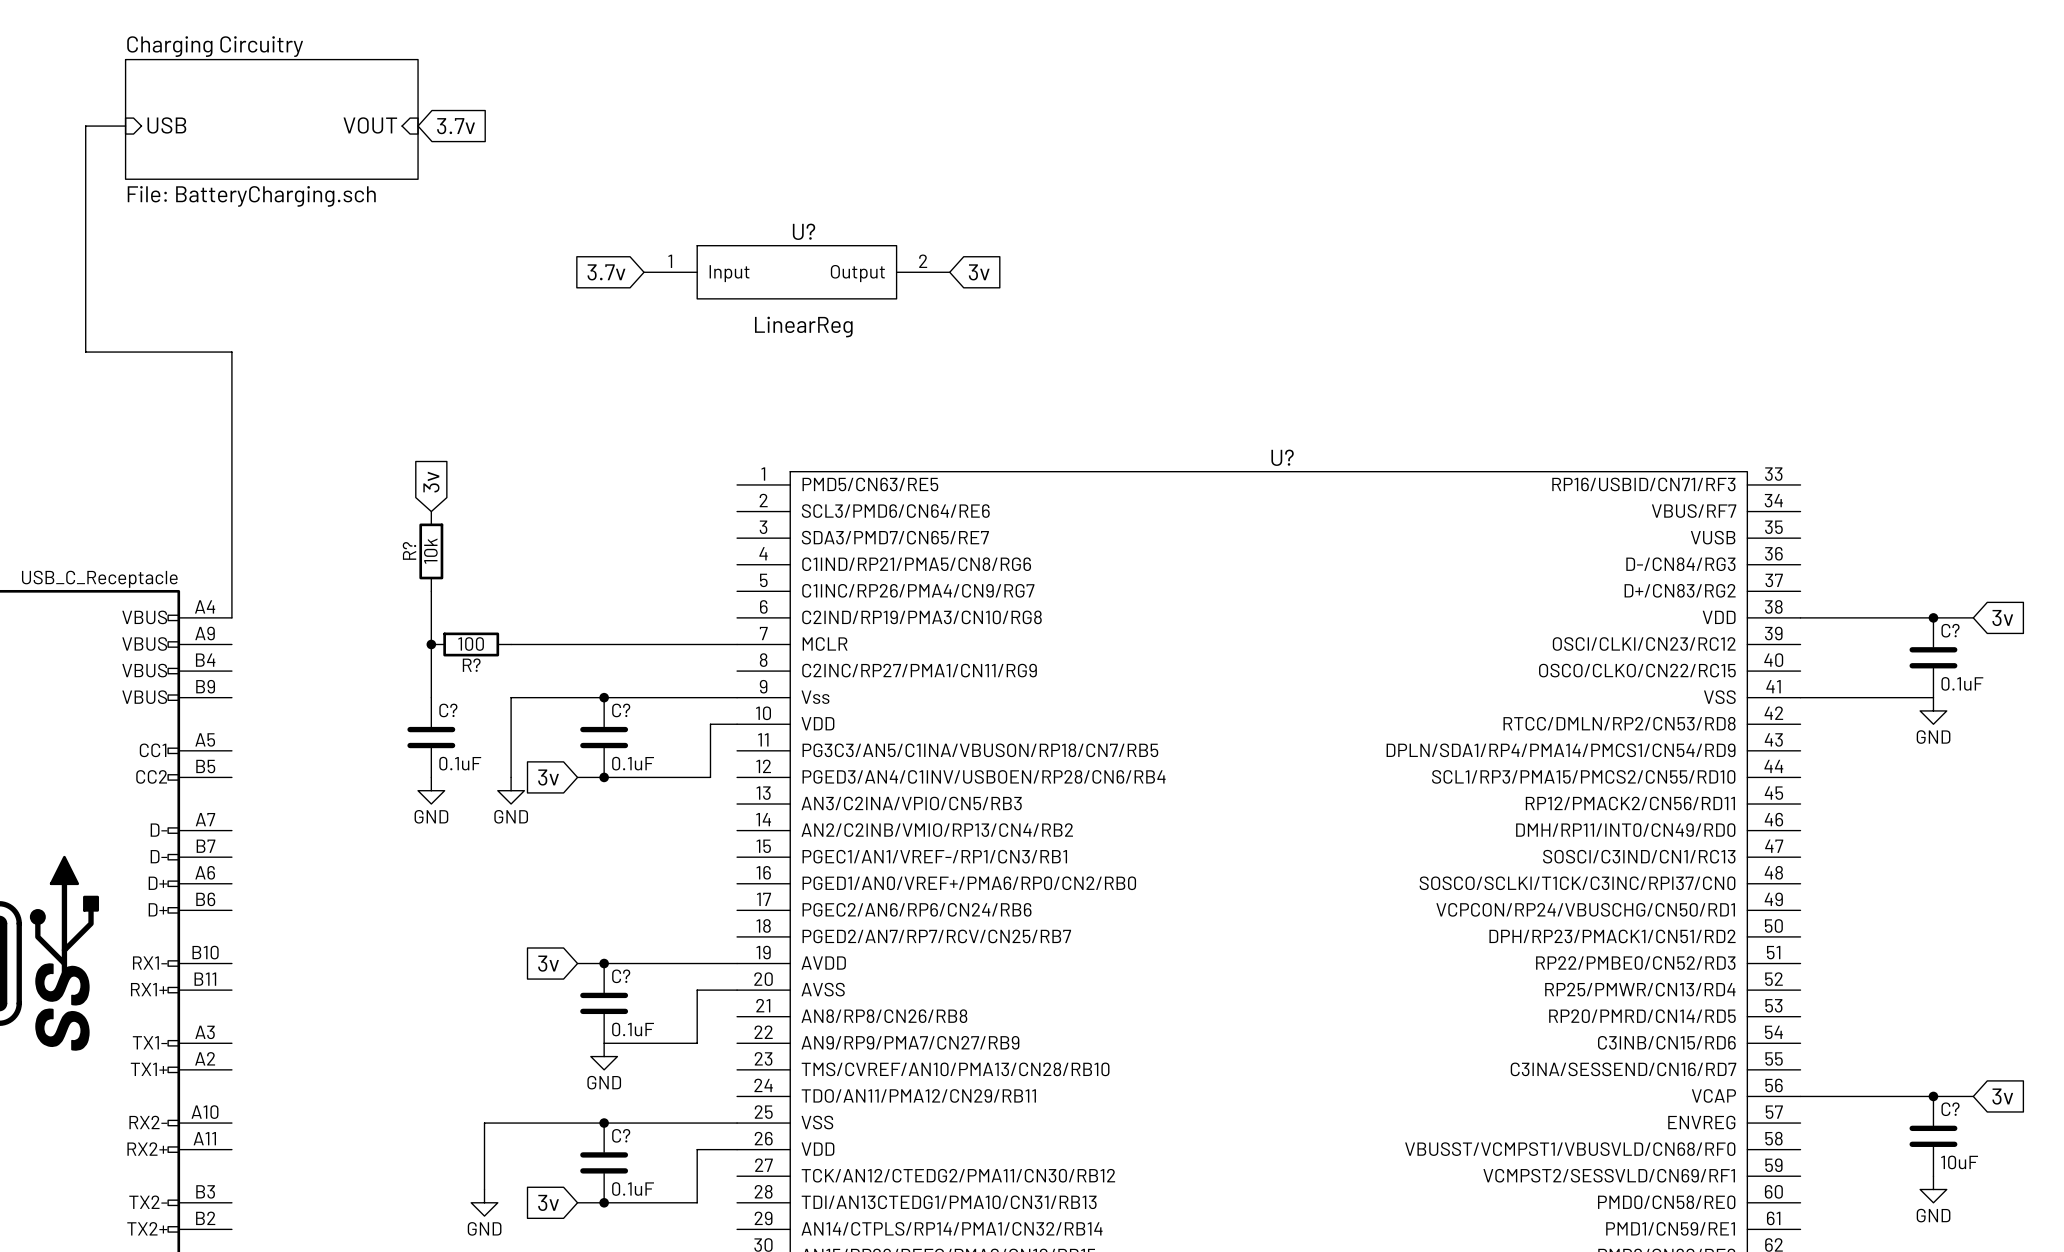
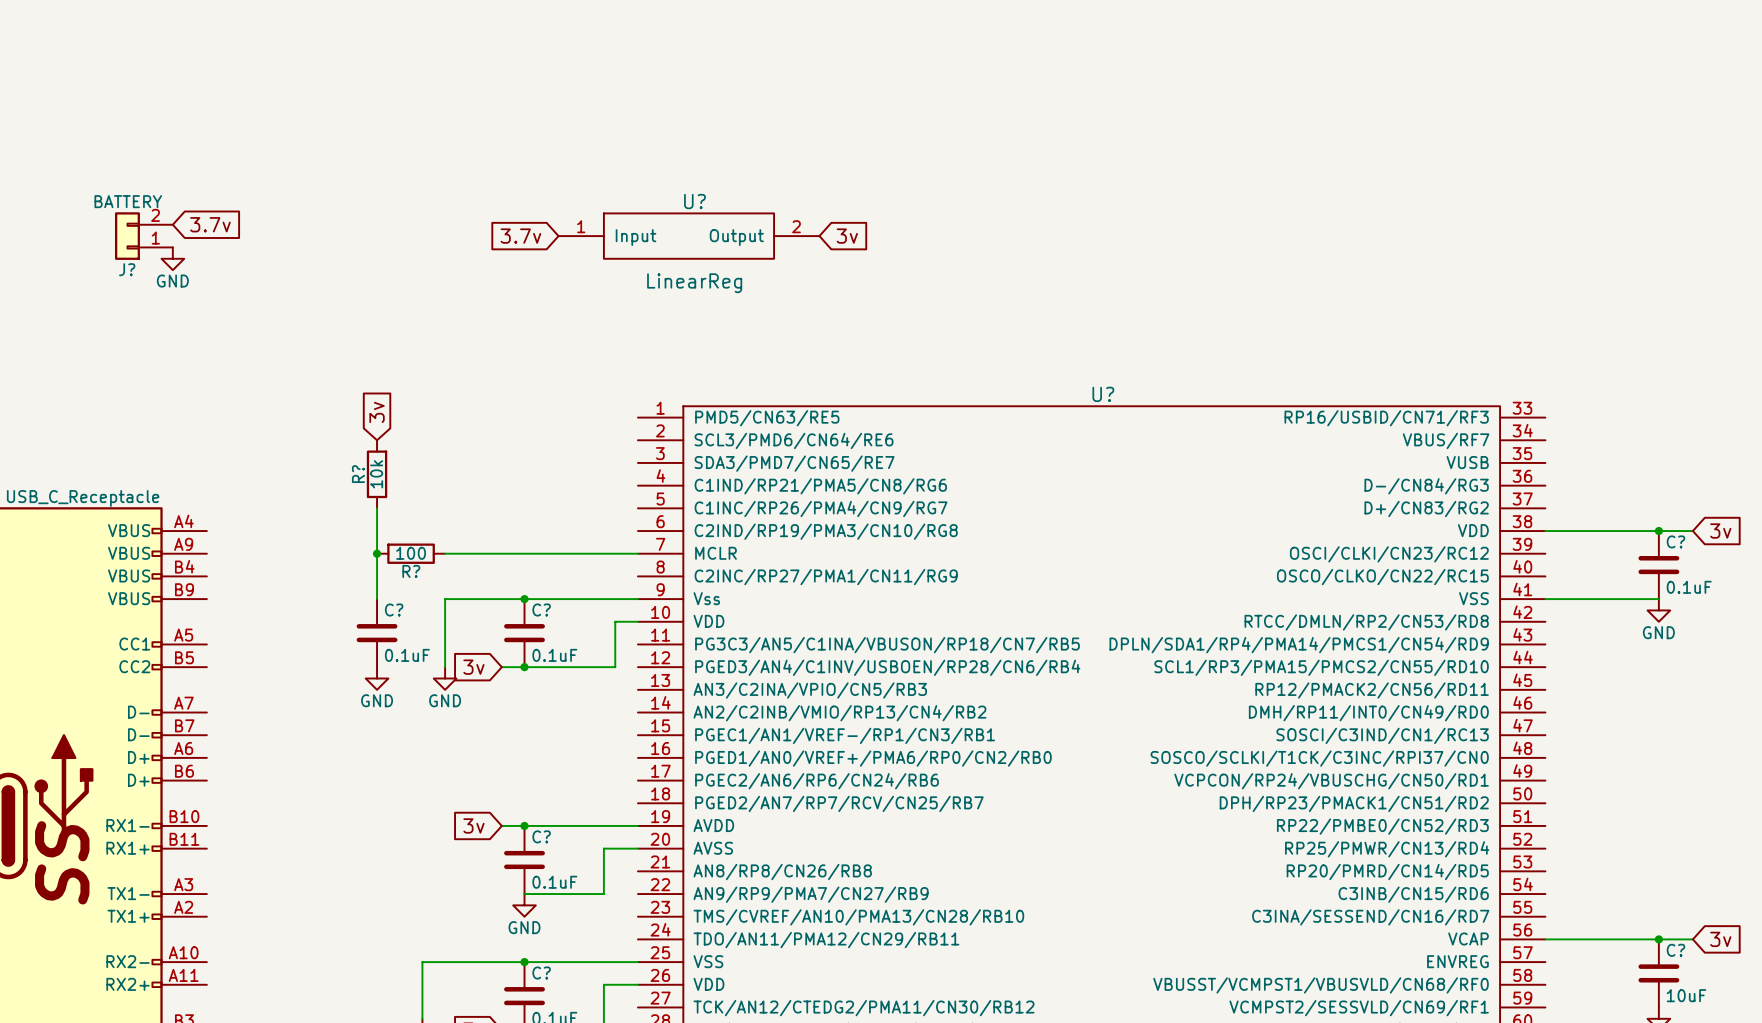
sheet Charging Circuitry: File: BatteryCharging.sch (271, 119) -> none
sheet pin: USB (166, 125) -> none
sheet pin: VOUT (370, 125) -> none
wire: (125, 126) (85, 126) (85, 352) (231, 352) (231, 617) -> none
global label: 3.7v (456, 126) -> none
global label: none -> 3.7v (210, 224)
J?: none -> BATTERY (143, 236)
power symbol: none -> GND (172, 258)

